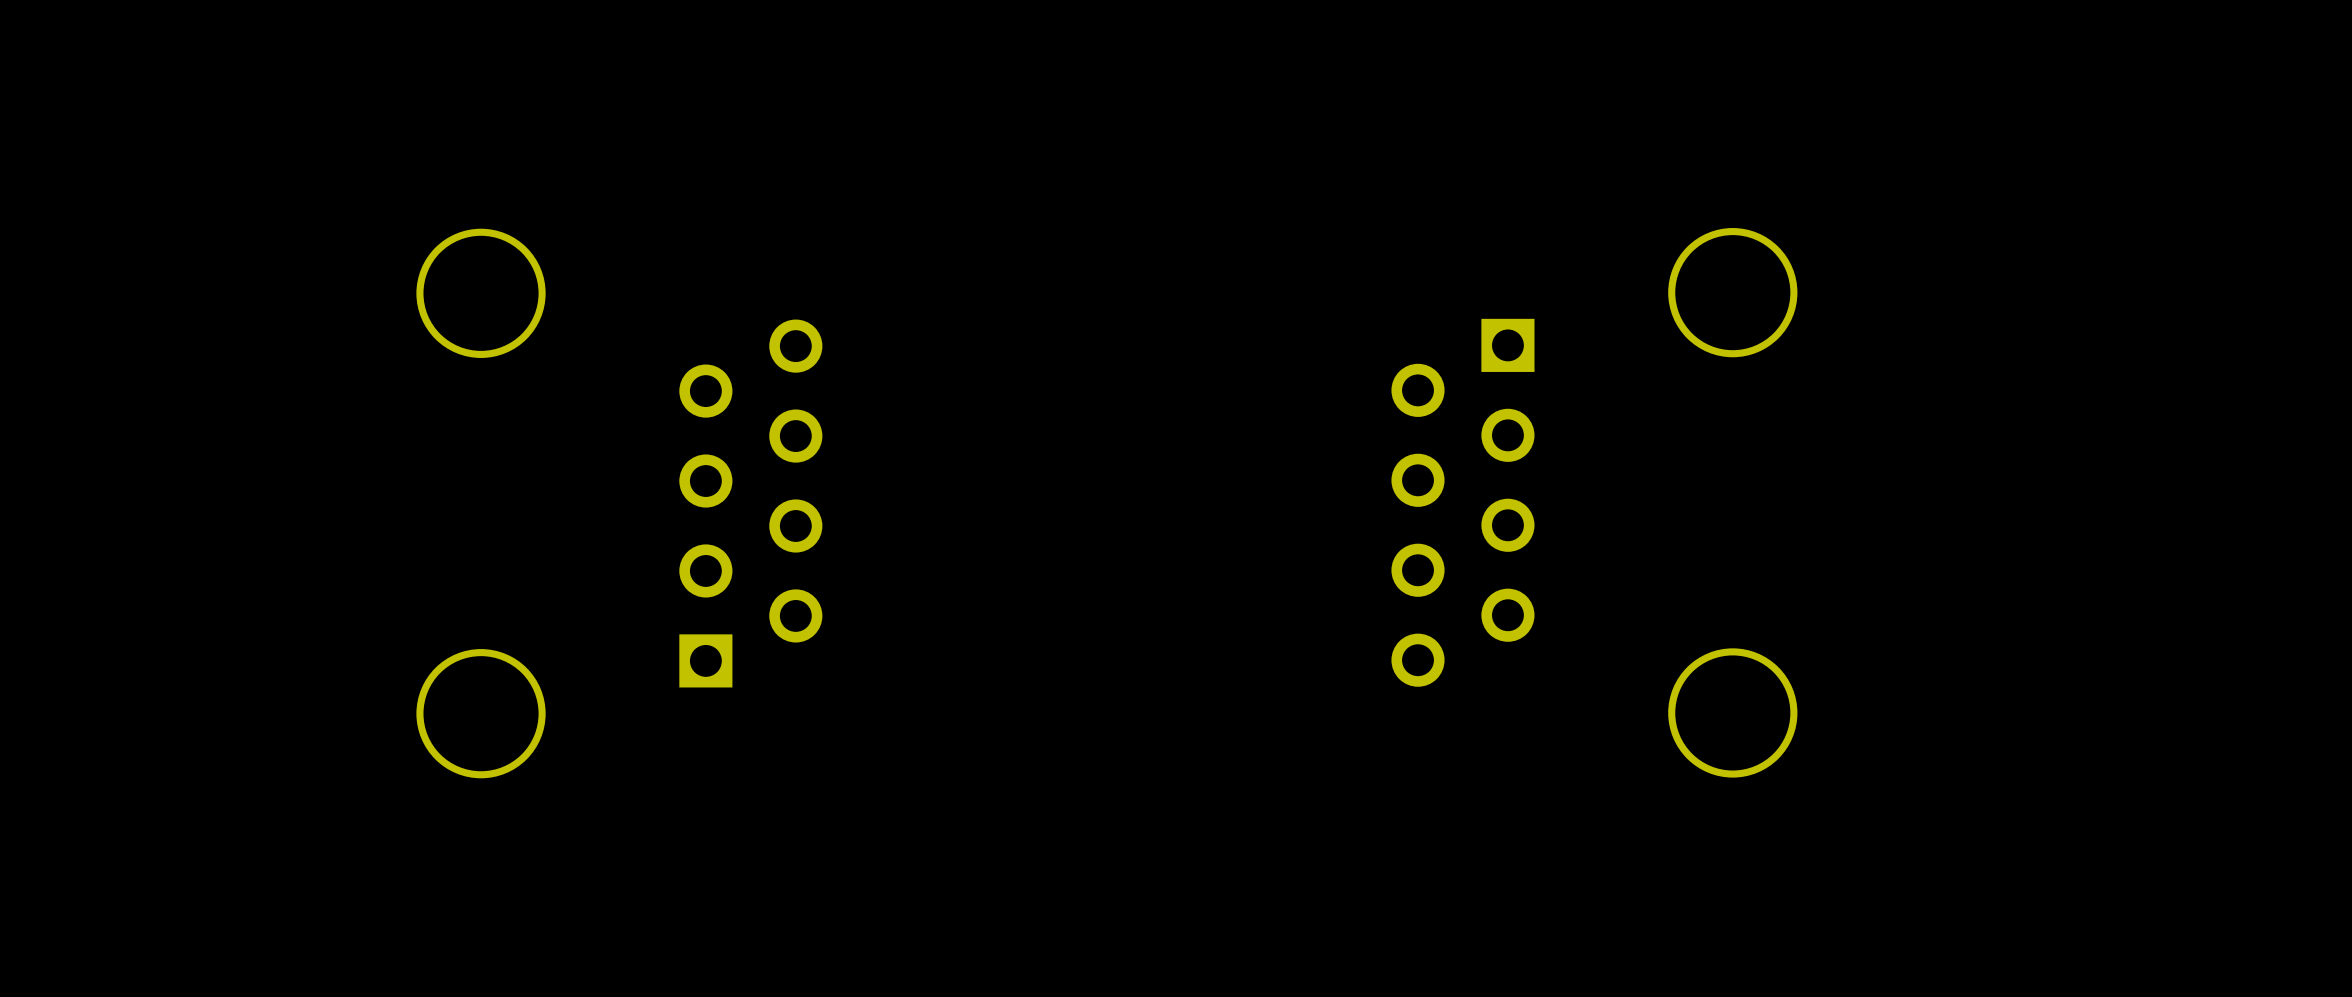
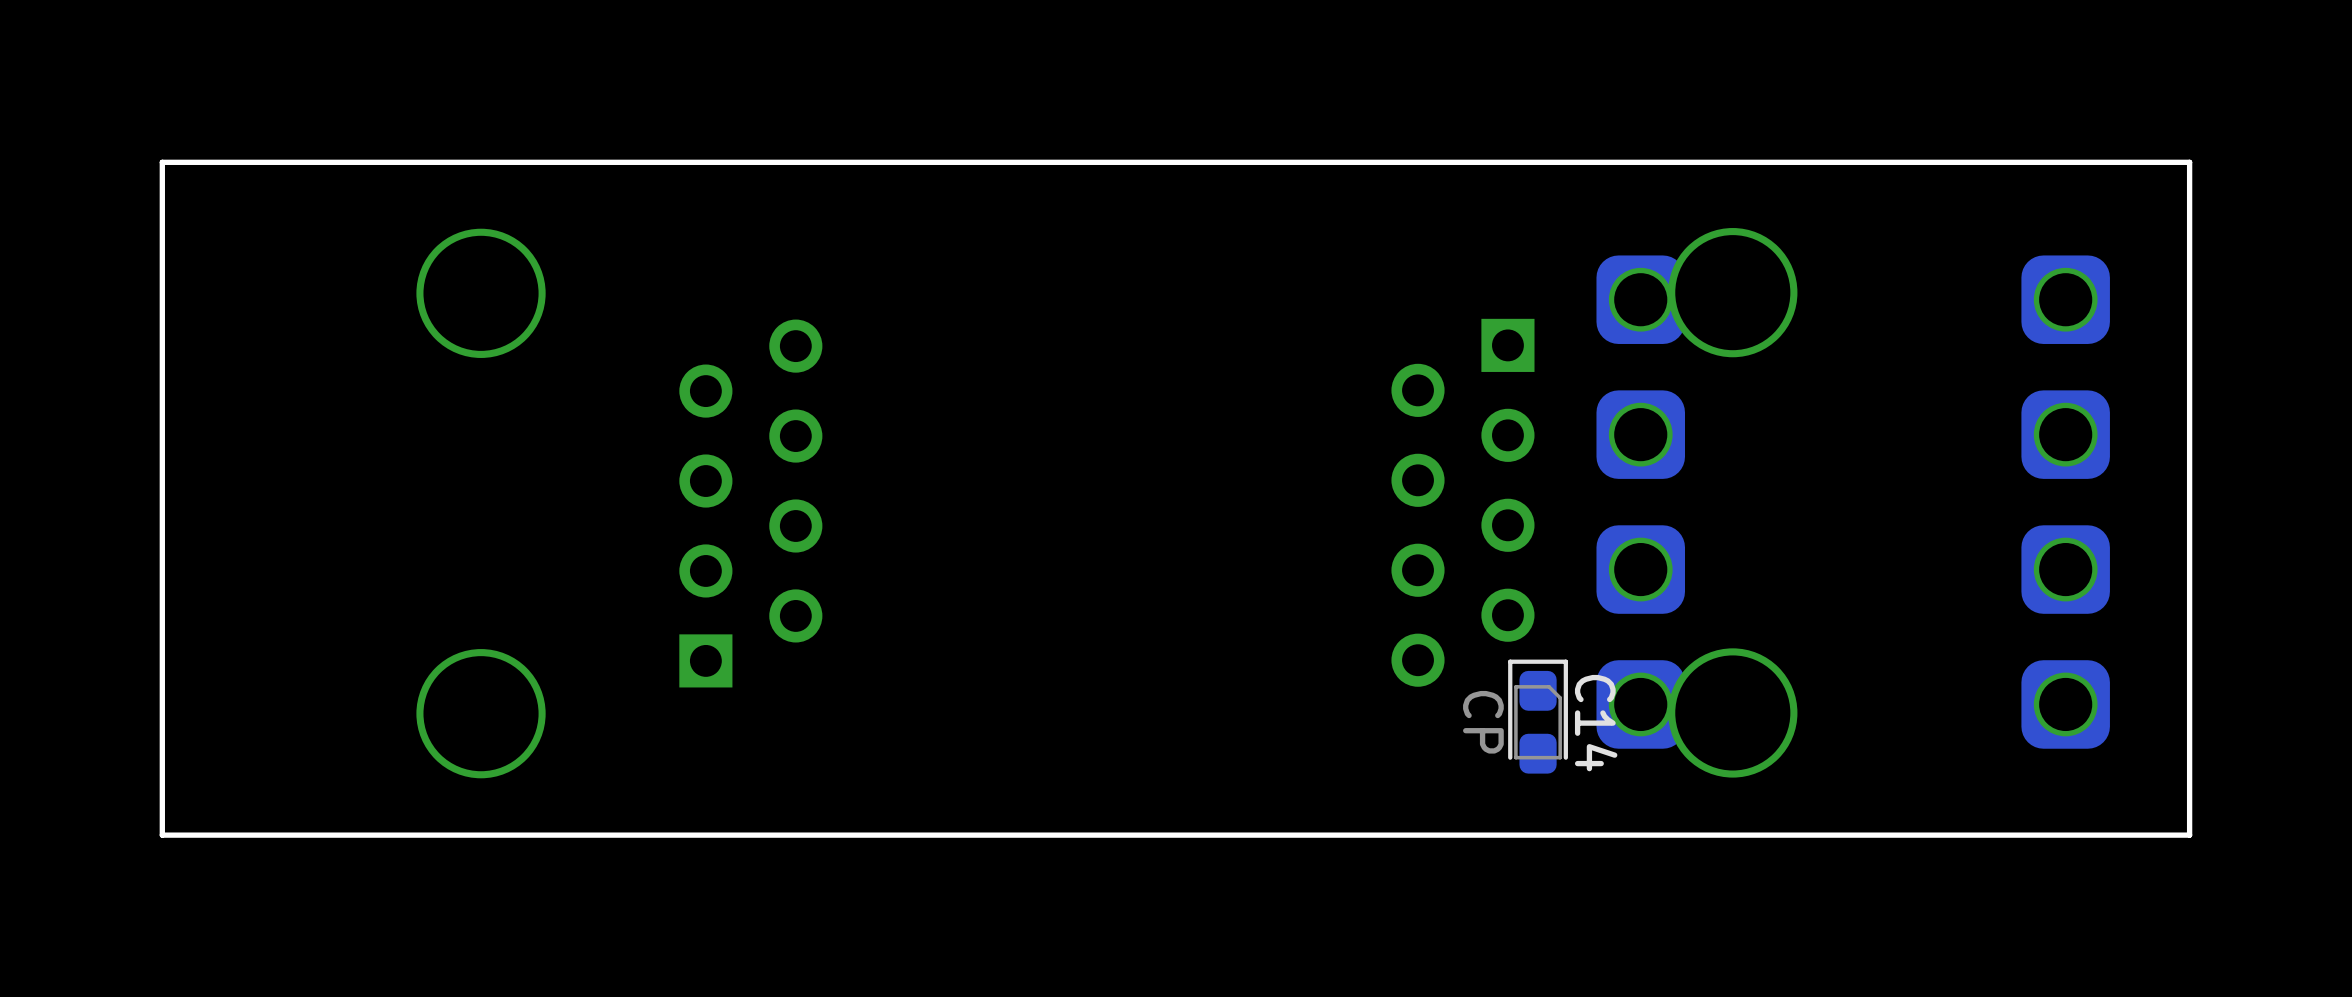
board edge: none -> (2189, 162) (2189, 835) (162, 835) (162, 162) (2189, 162)
part: none -> (1640, 502)
part: none -> (2065, 502)
C14: none -> CP (1538, 716)

